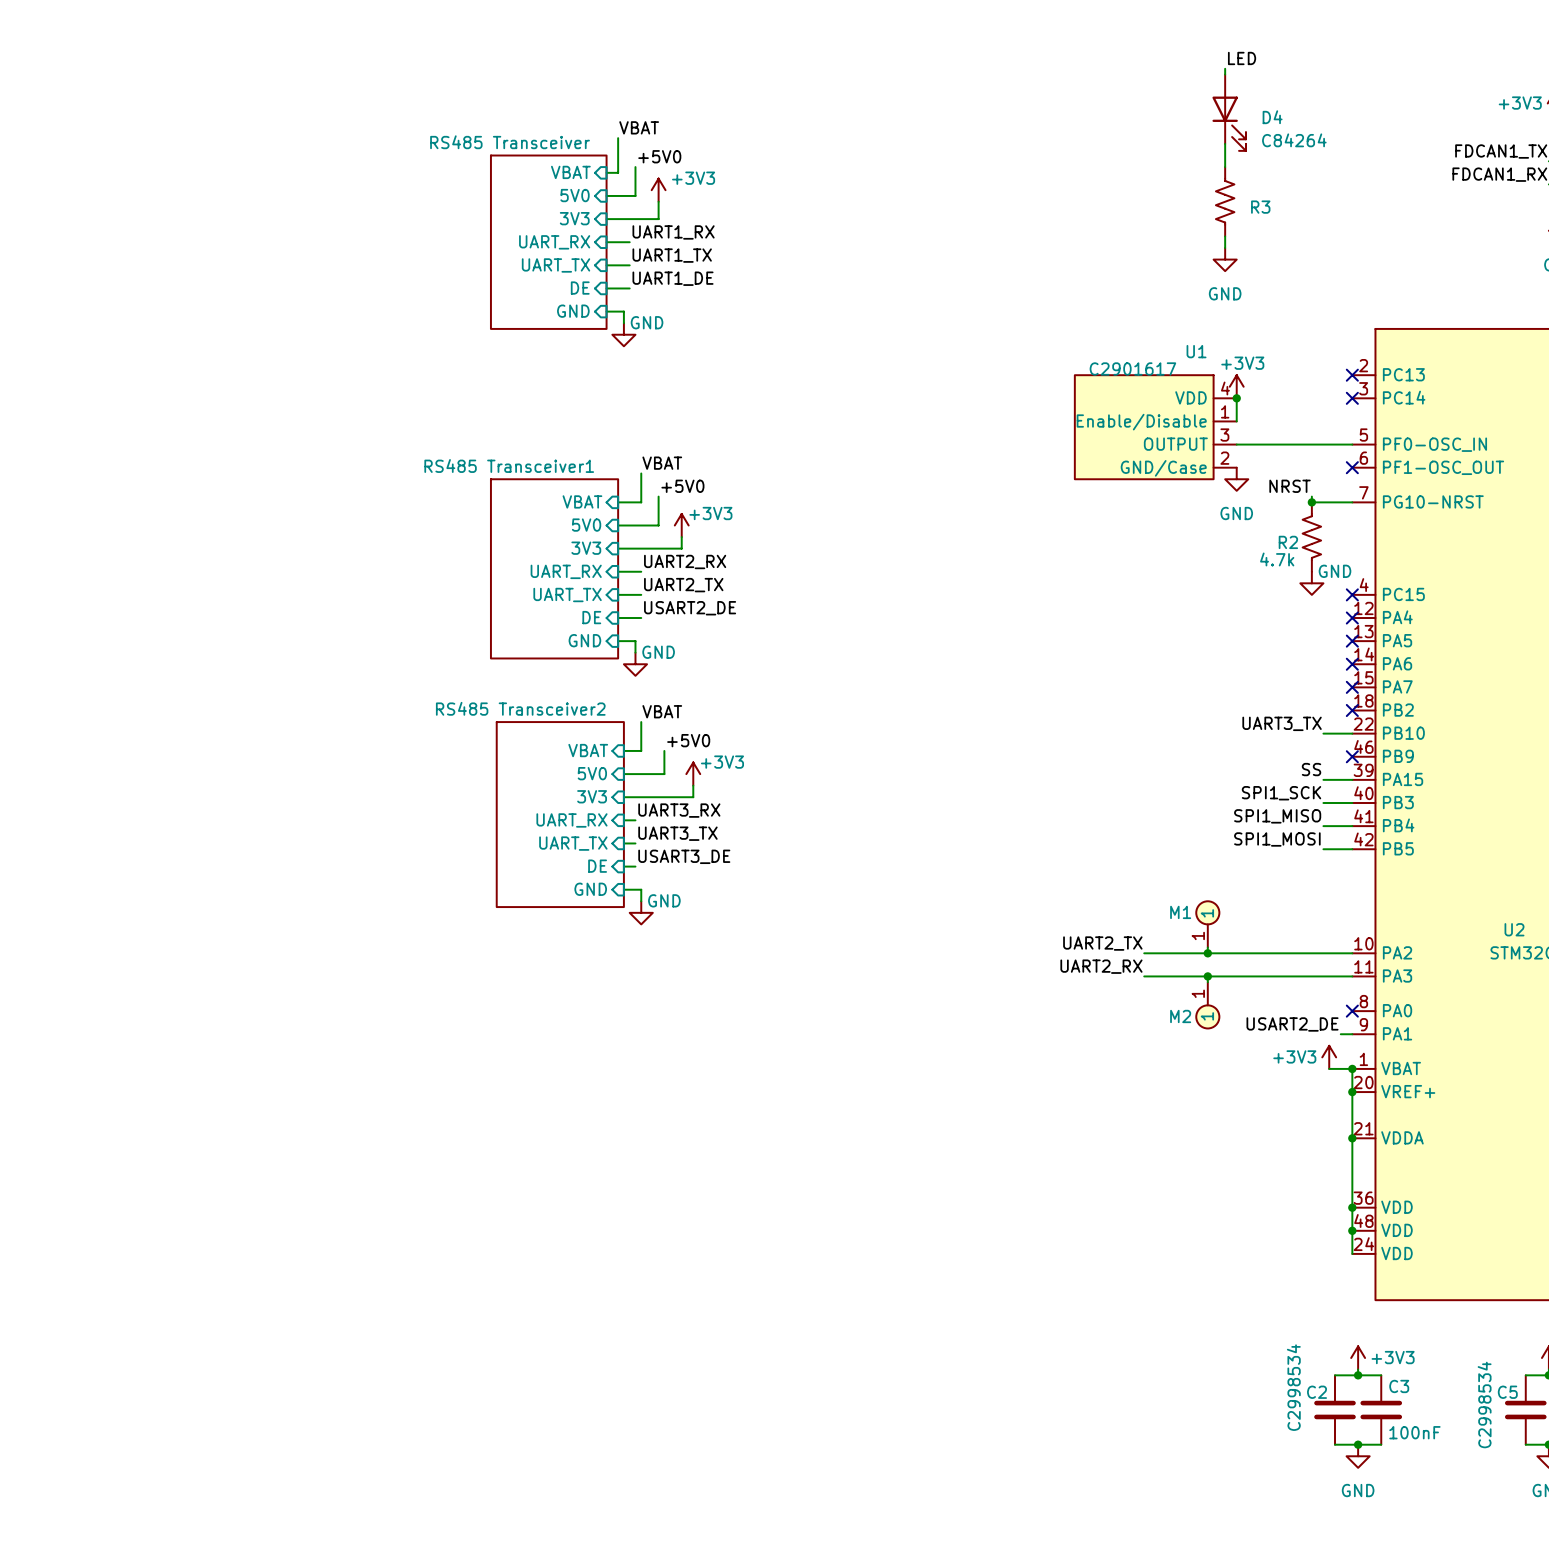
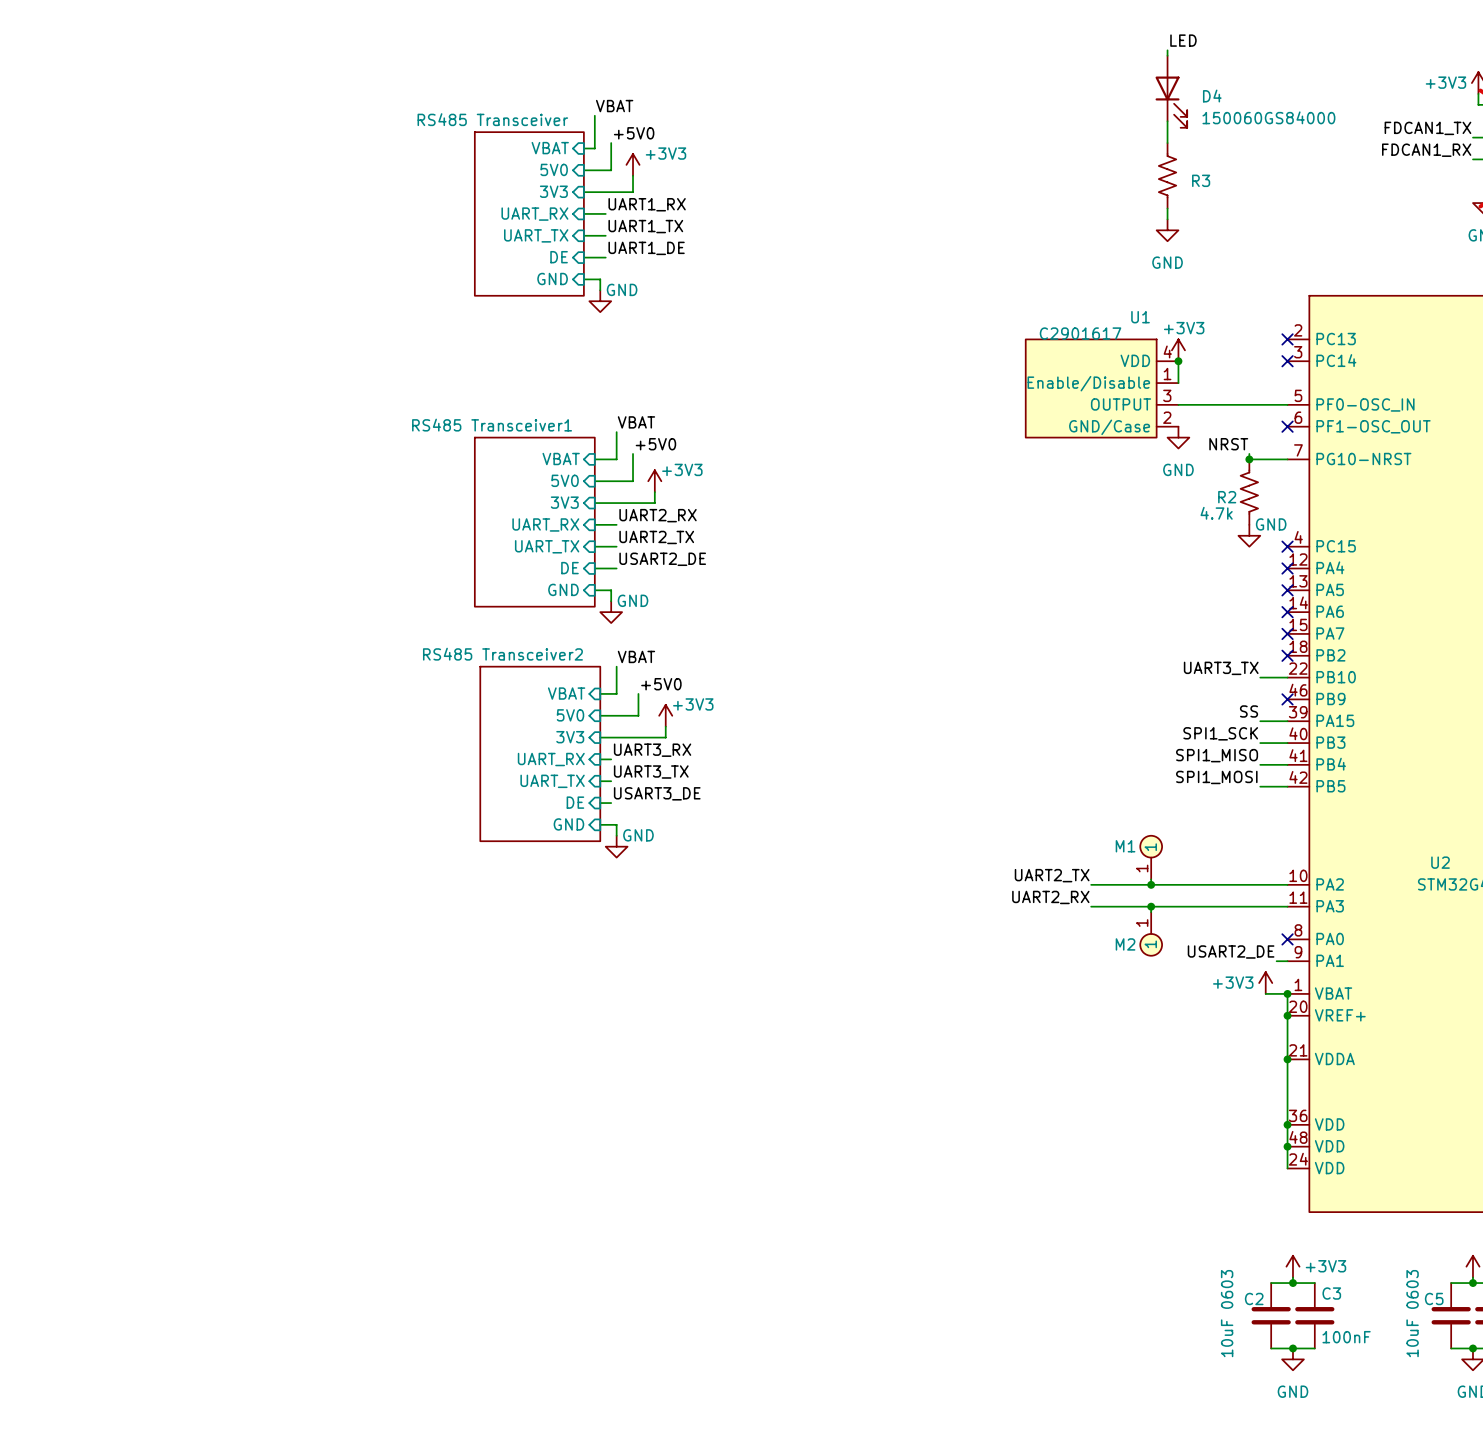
D4 value: C84264 (1294, 140) -> 150060GS84000 (1268, 117)
C2 value: C2998534 (1293, 1387) -> 10uF 0603 (1227, 1313)
C5 value: C2998534 (1484, 1404) -> 10uF 0603 (1412, 1313)

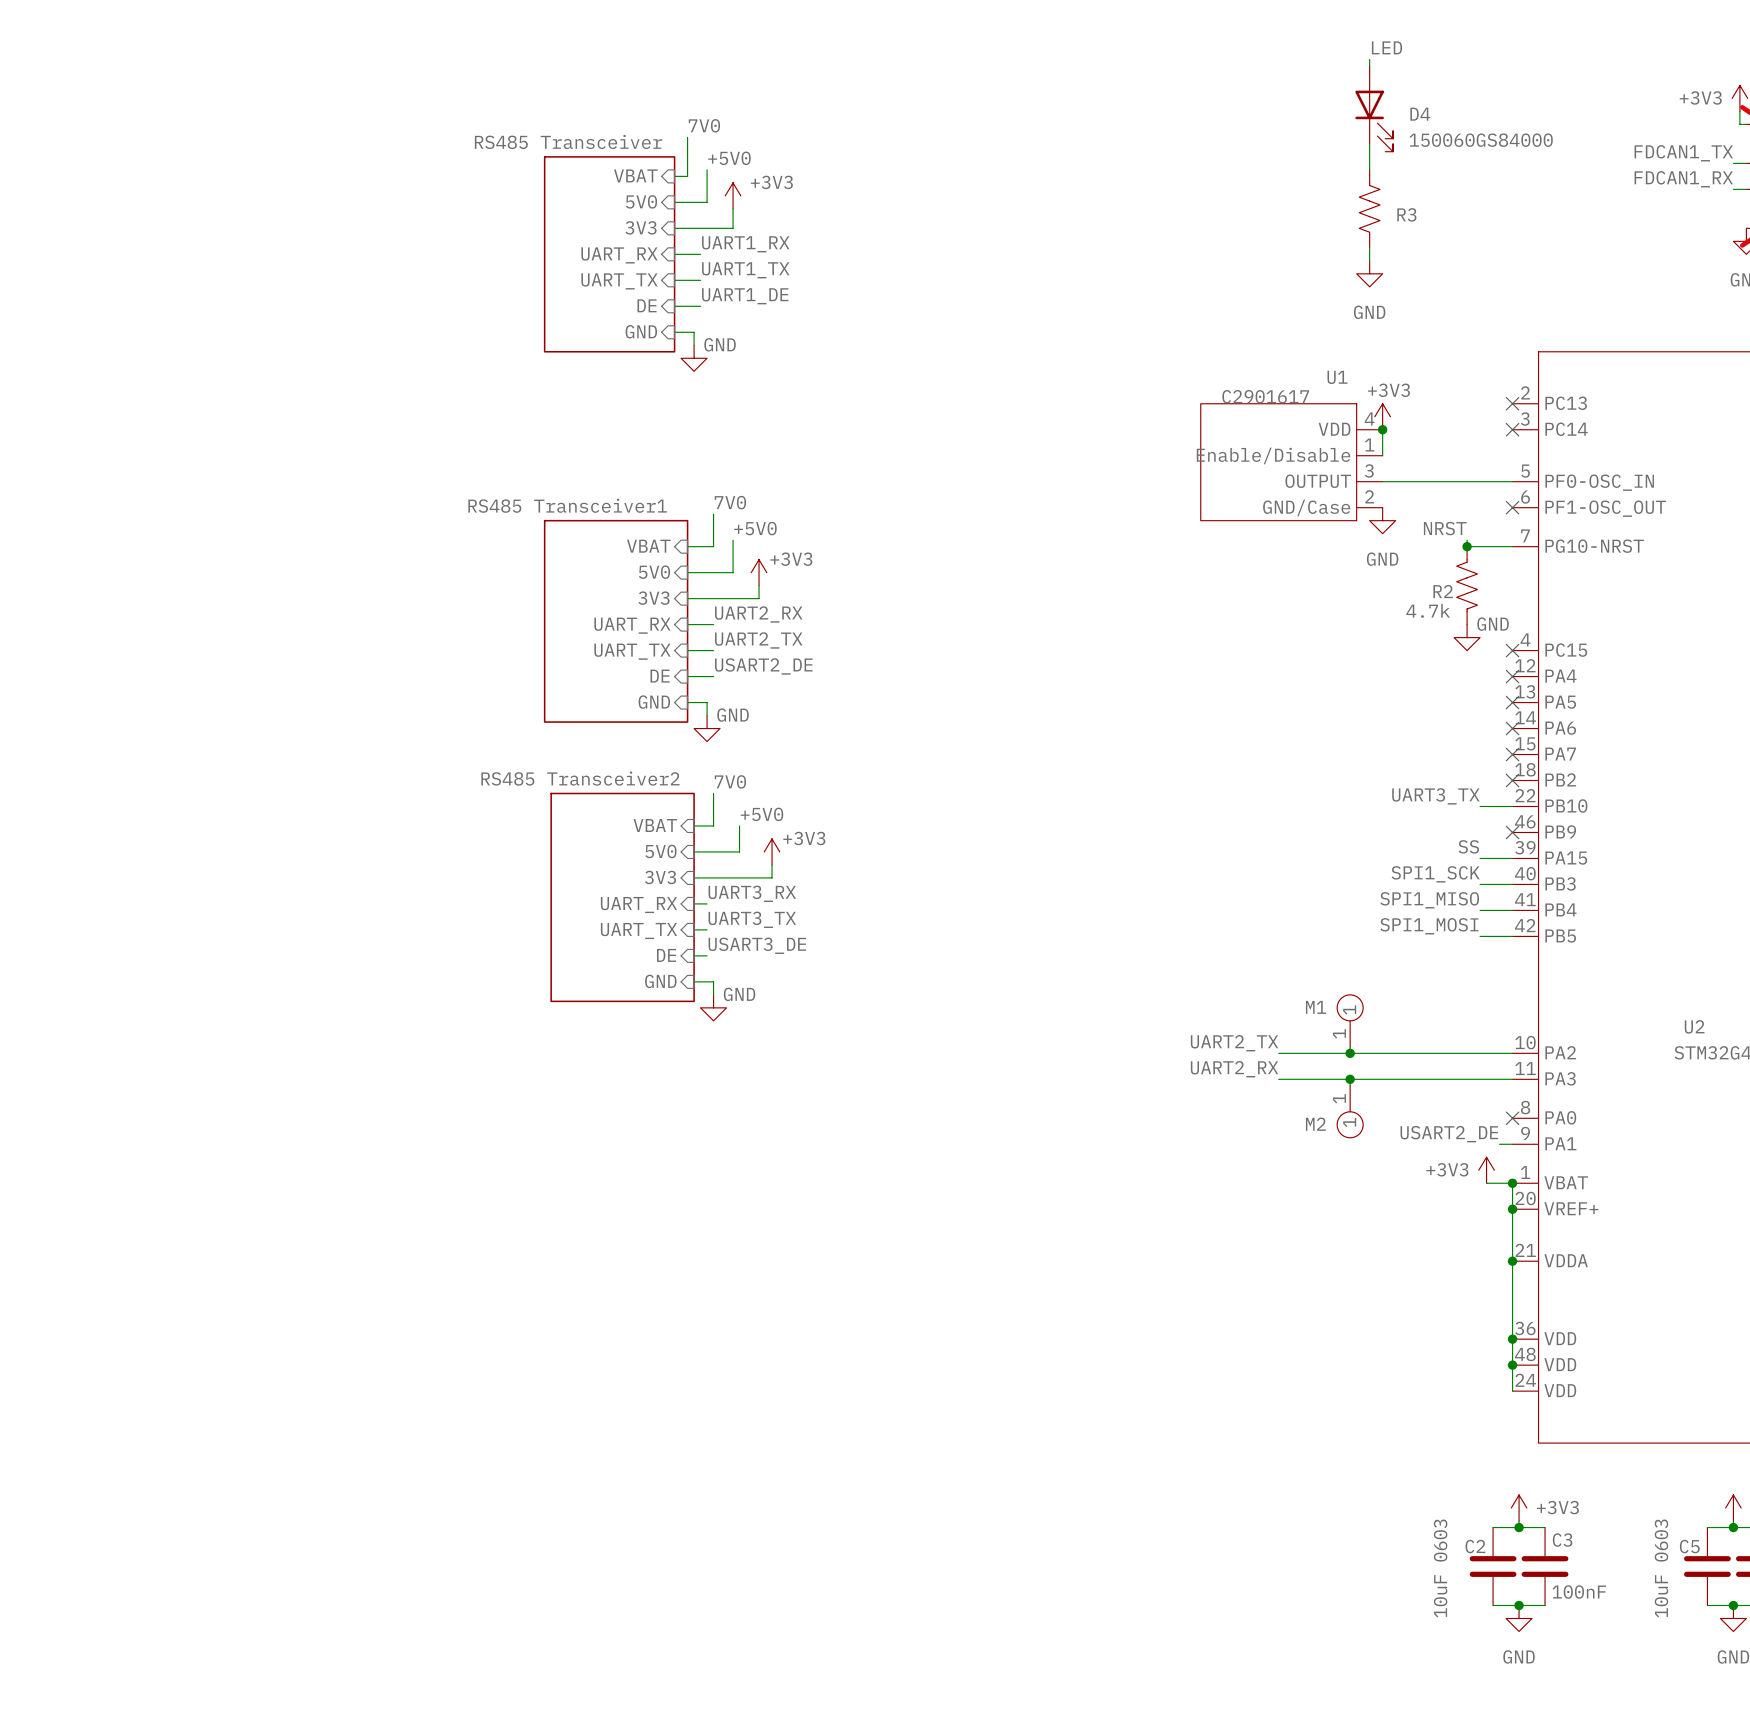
label: VBAT (614, 106) -> 7V0 (704, 125)
label: VBAT (636, 422) -> 7V0 (730, 502)
label: VBAT (636, 656) -> 7V0 (730, 781)

